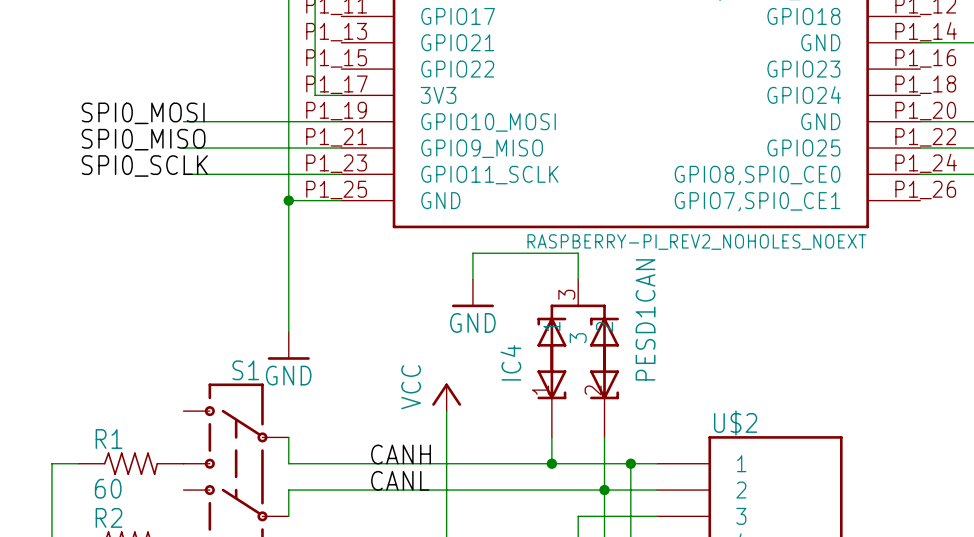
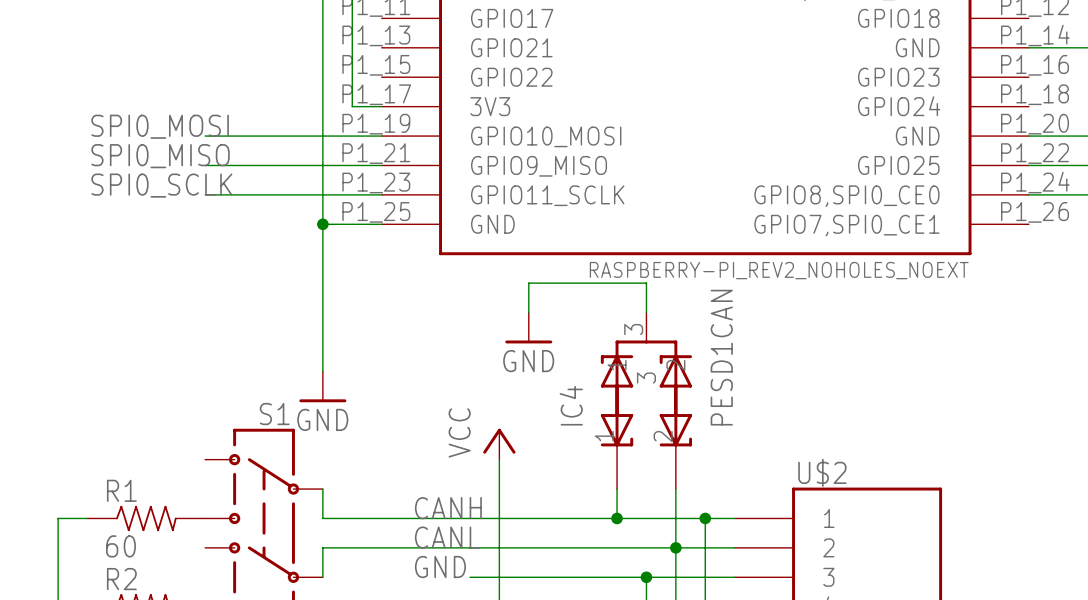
label: none -> GND (440, 567)
wire: none -> (469, 577) (646, 577)
junction: none -> (646, 577)

